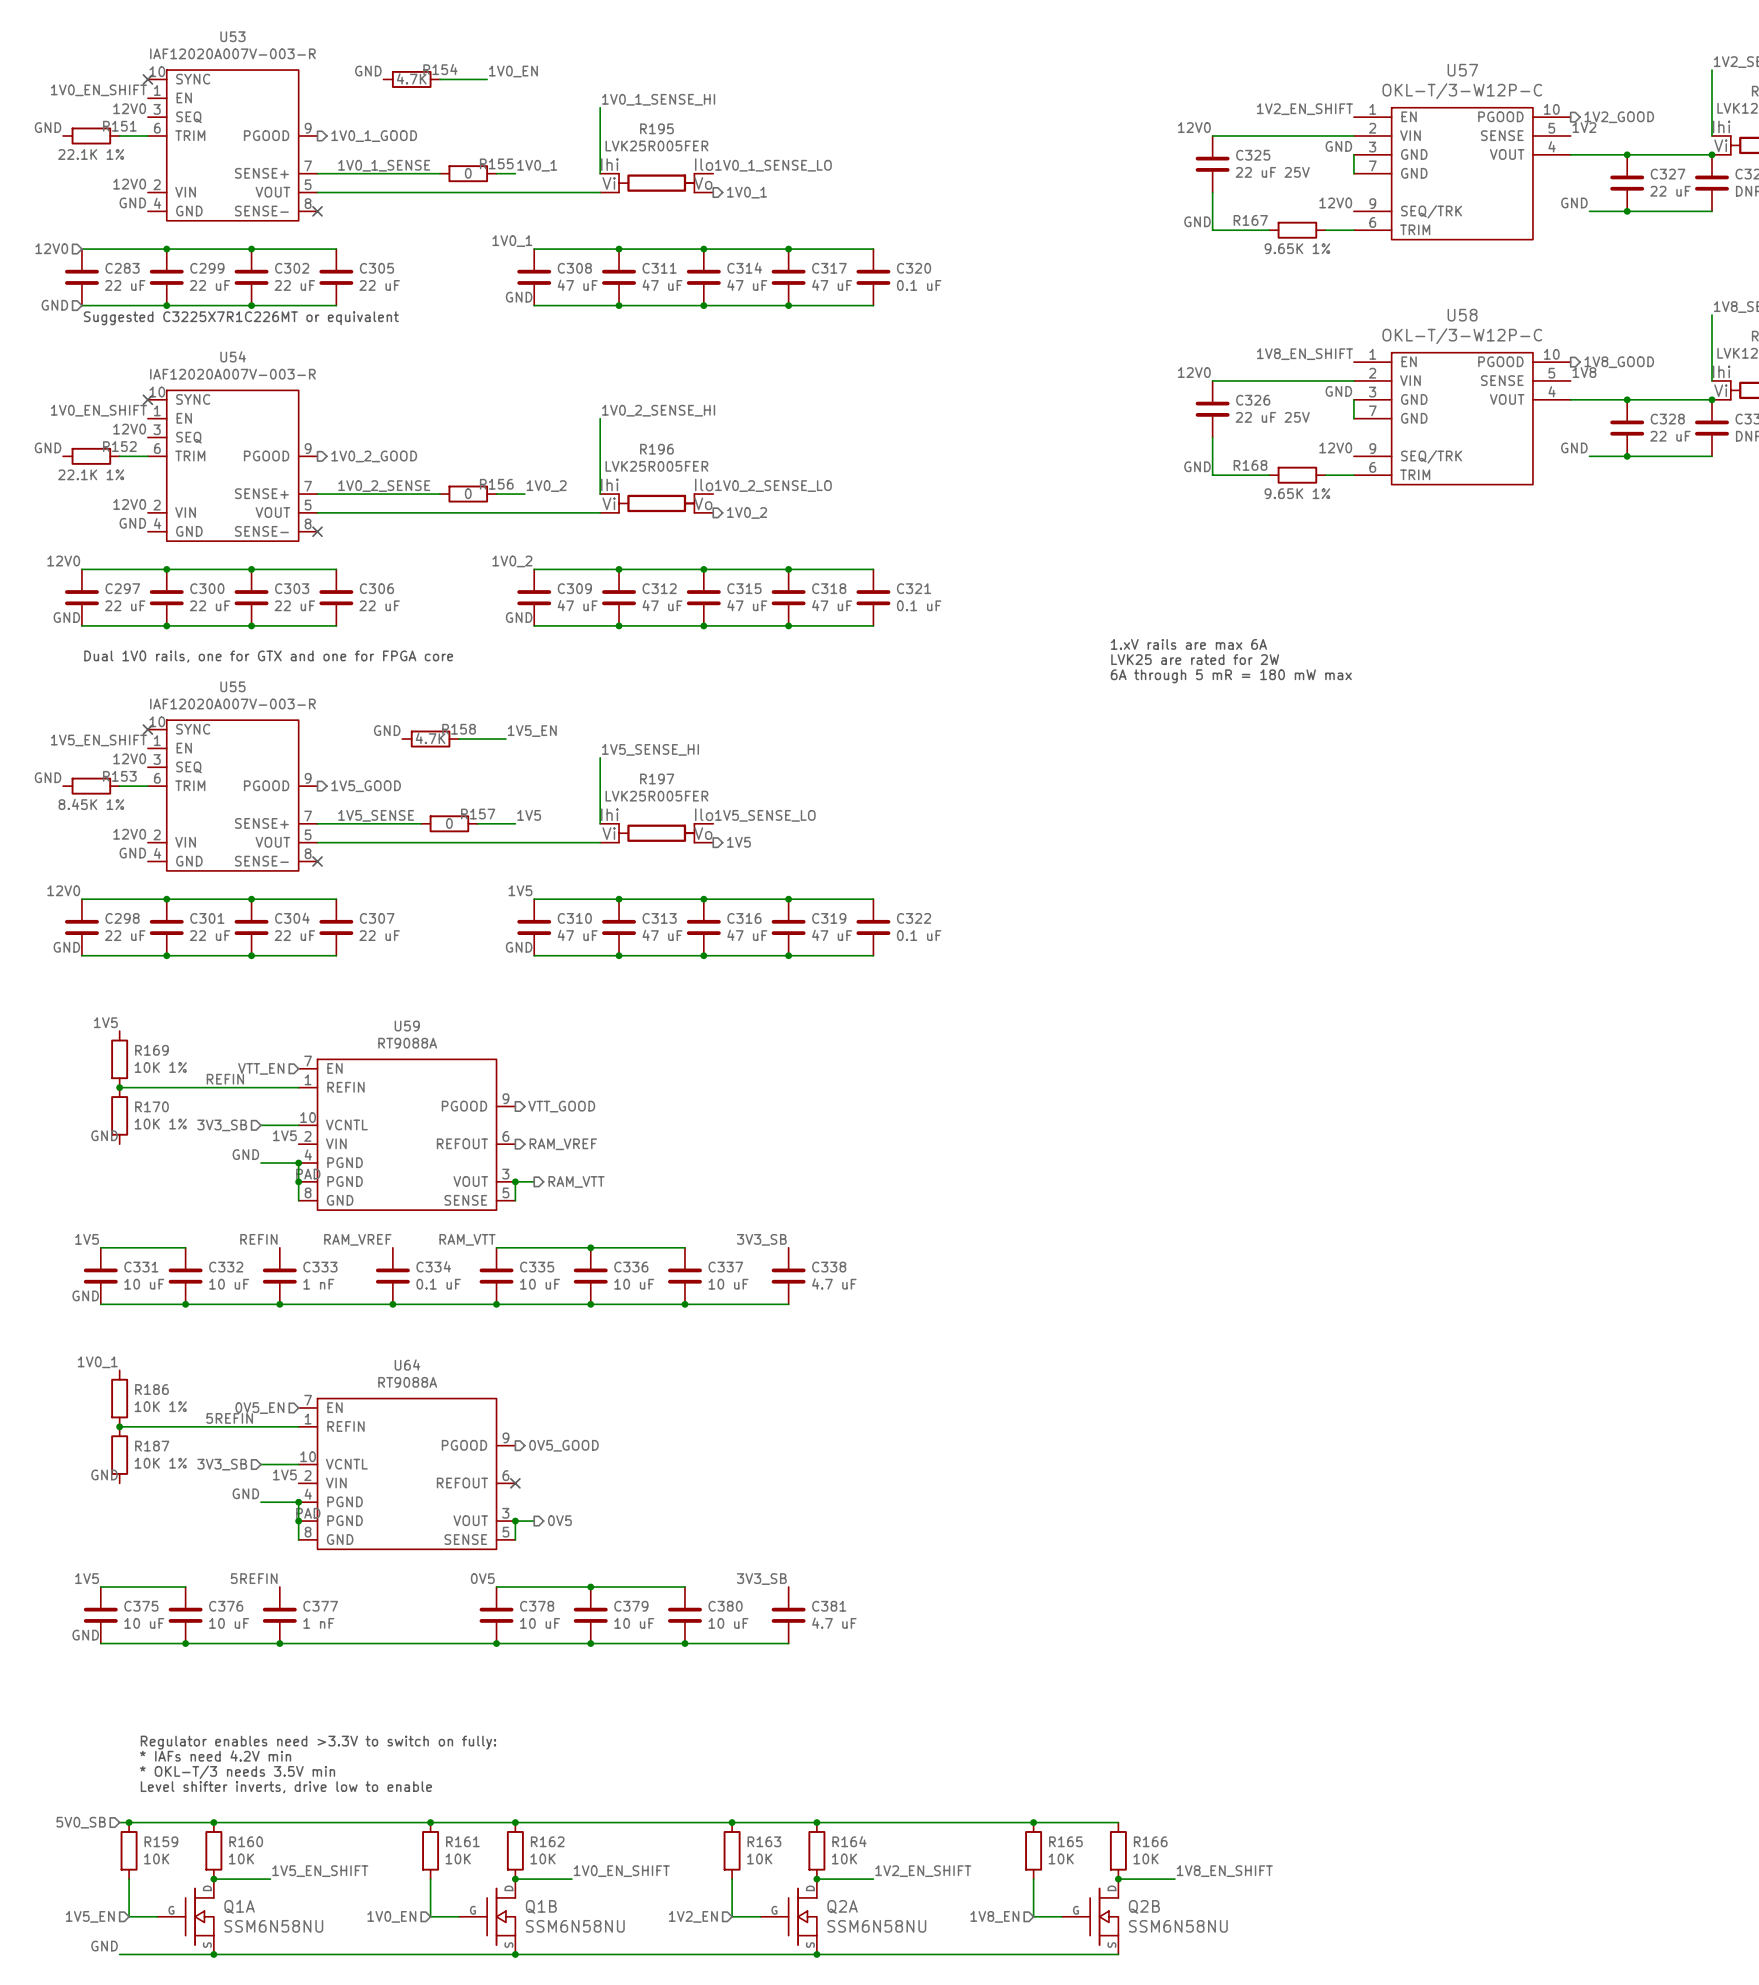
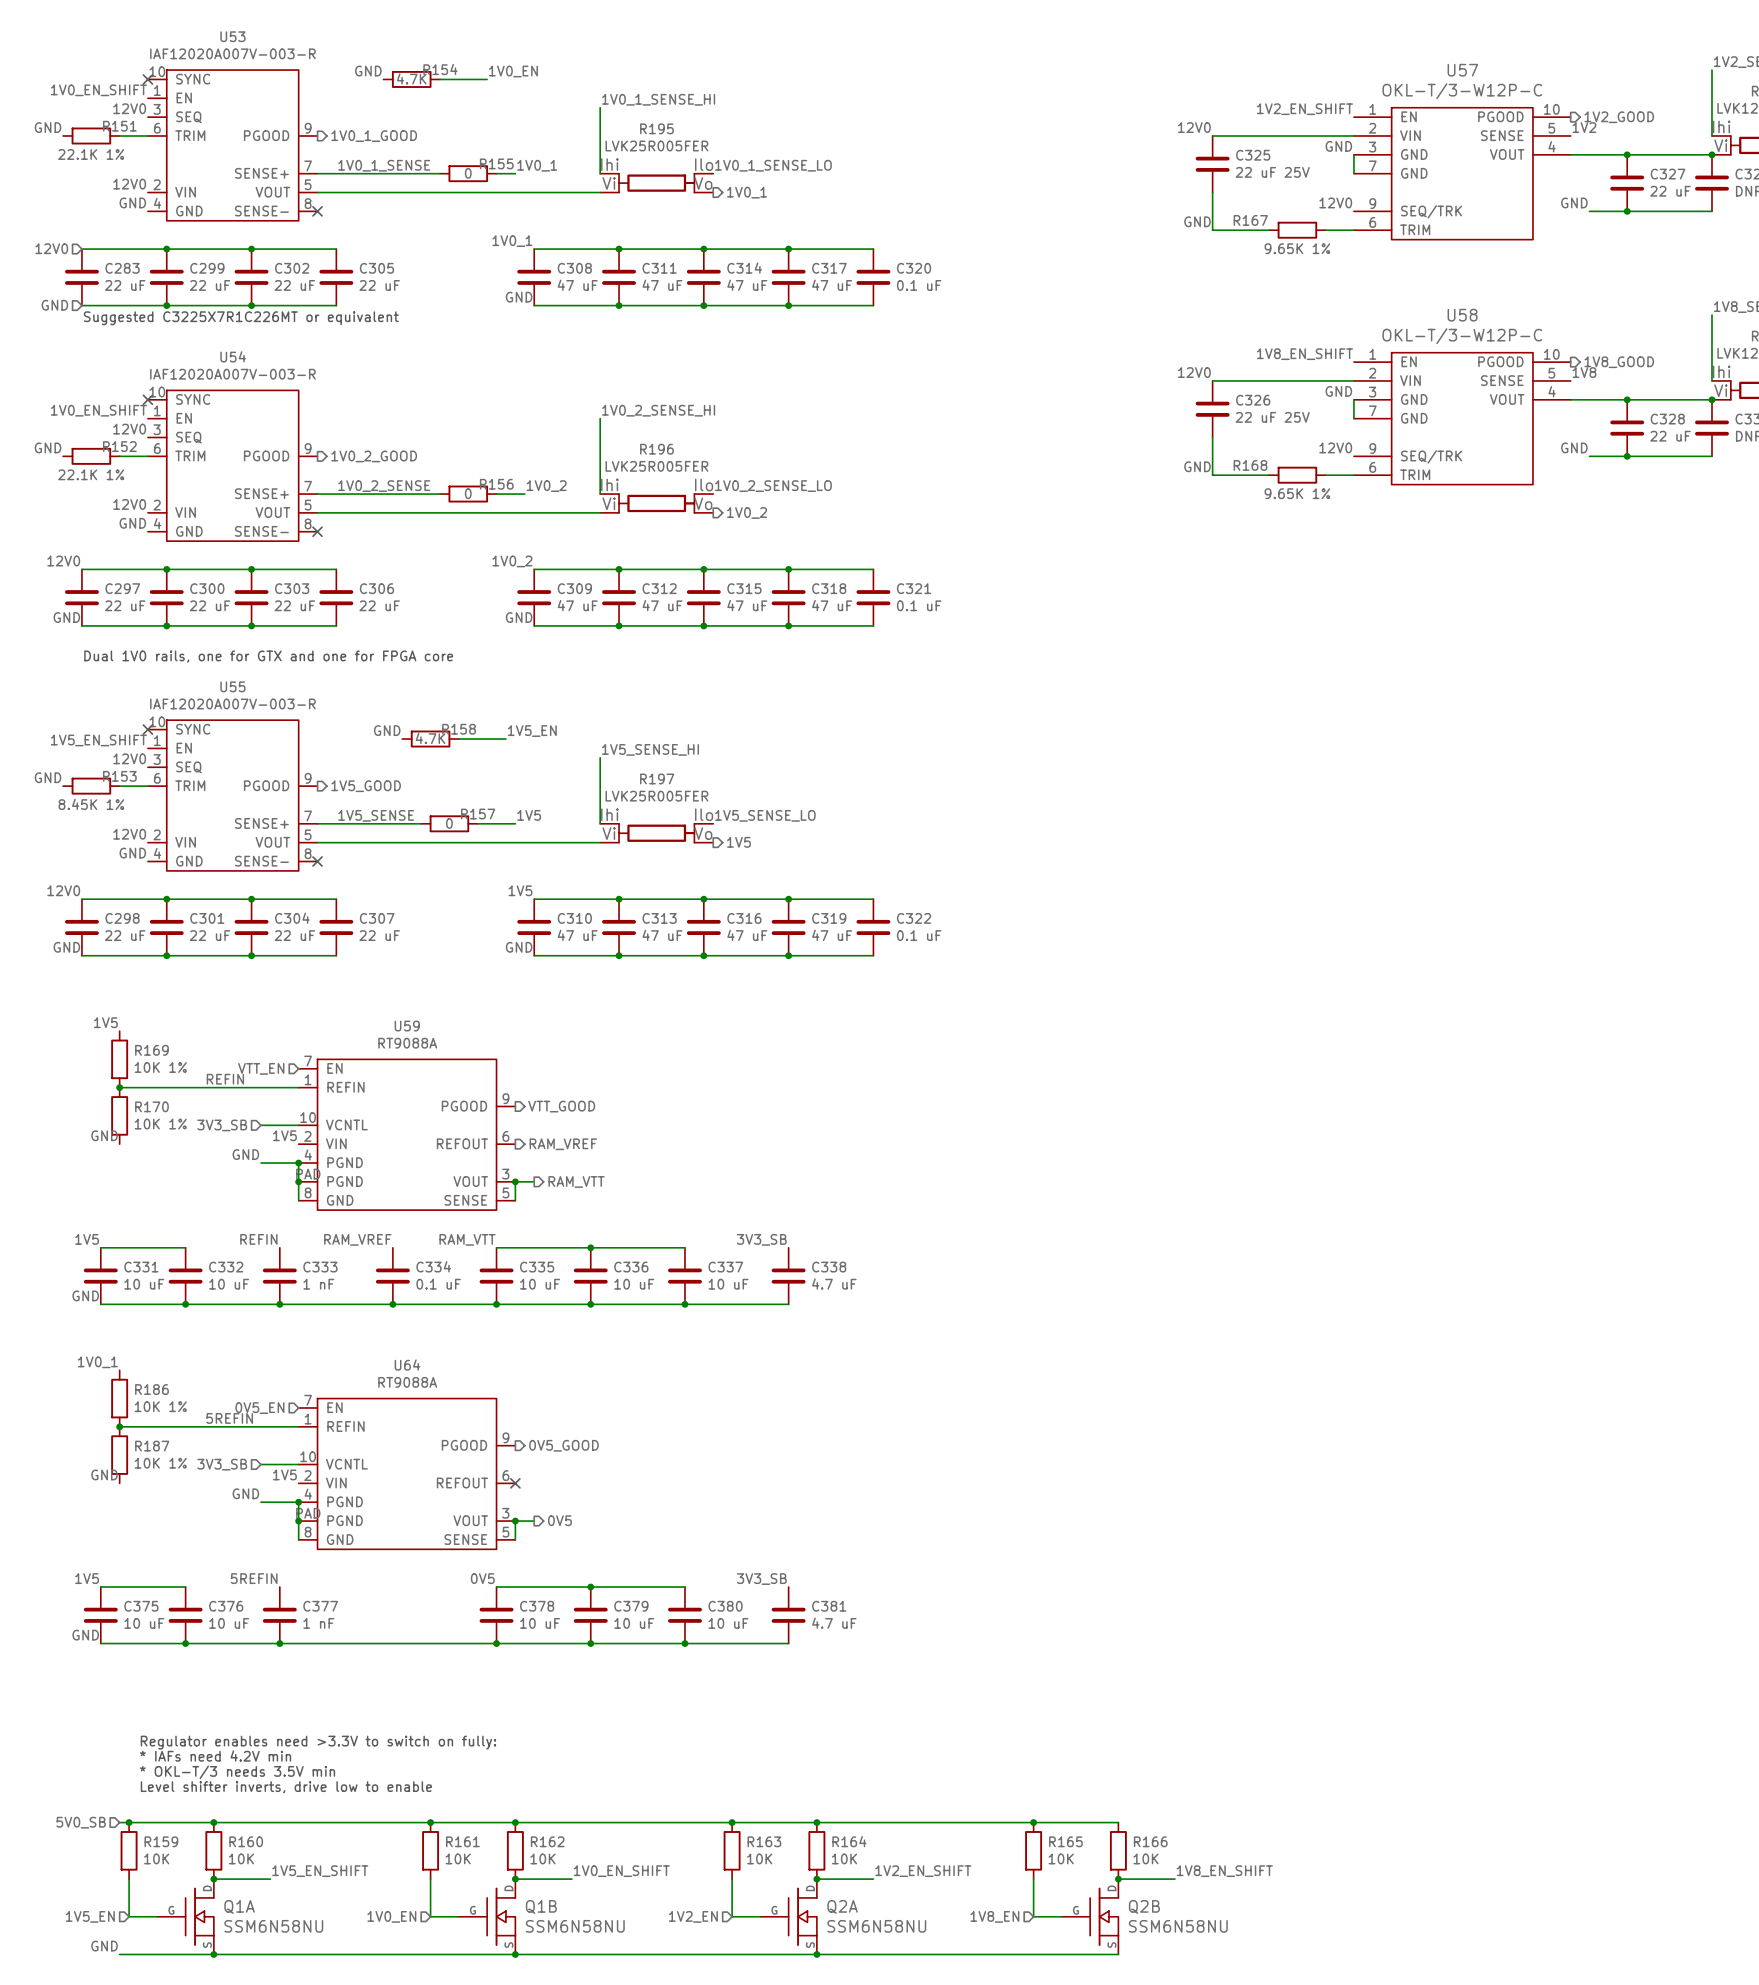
text: 1.xV rails are max 6A (1188, 644) -> none
text: LVK25 are rated for 2W (1195, 659) -> none
text: 6A through 5 mR = 180 mW max (1231, 676) -> none

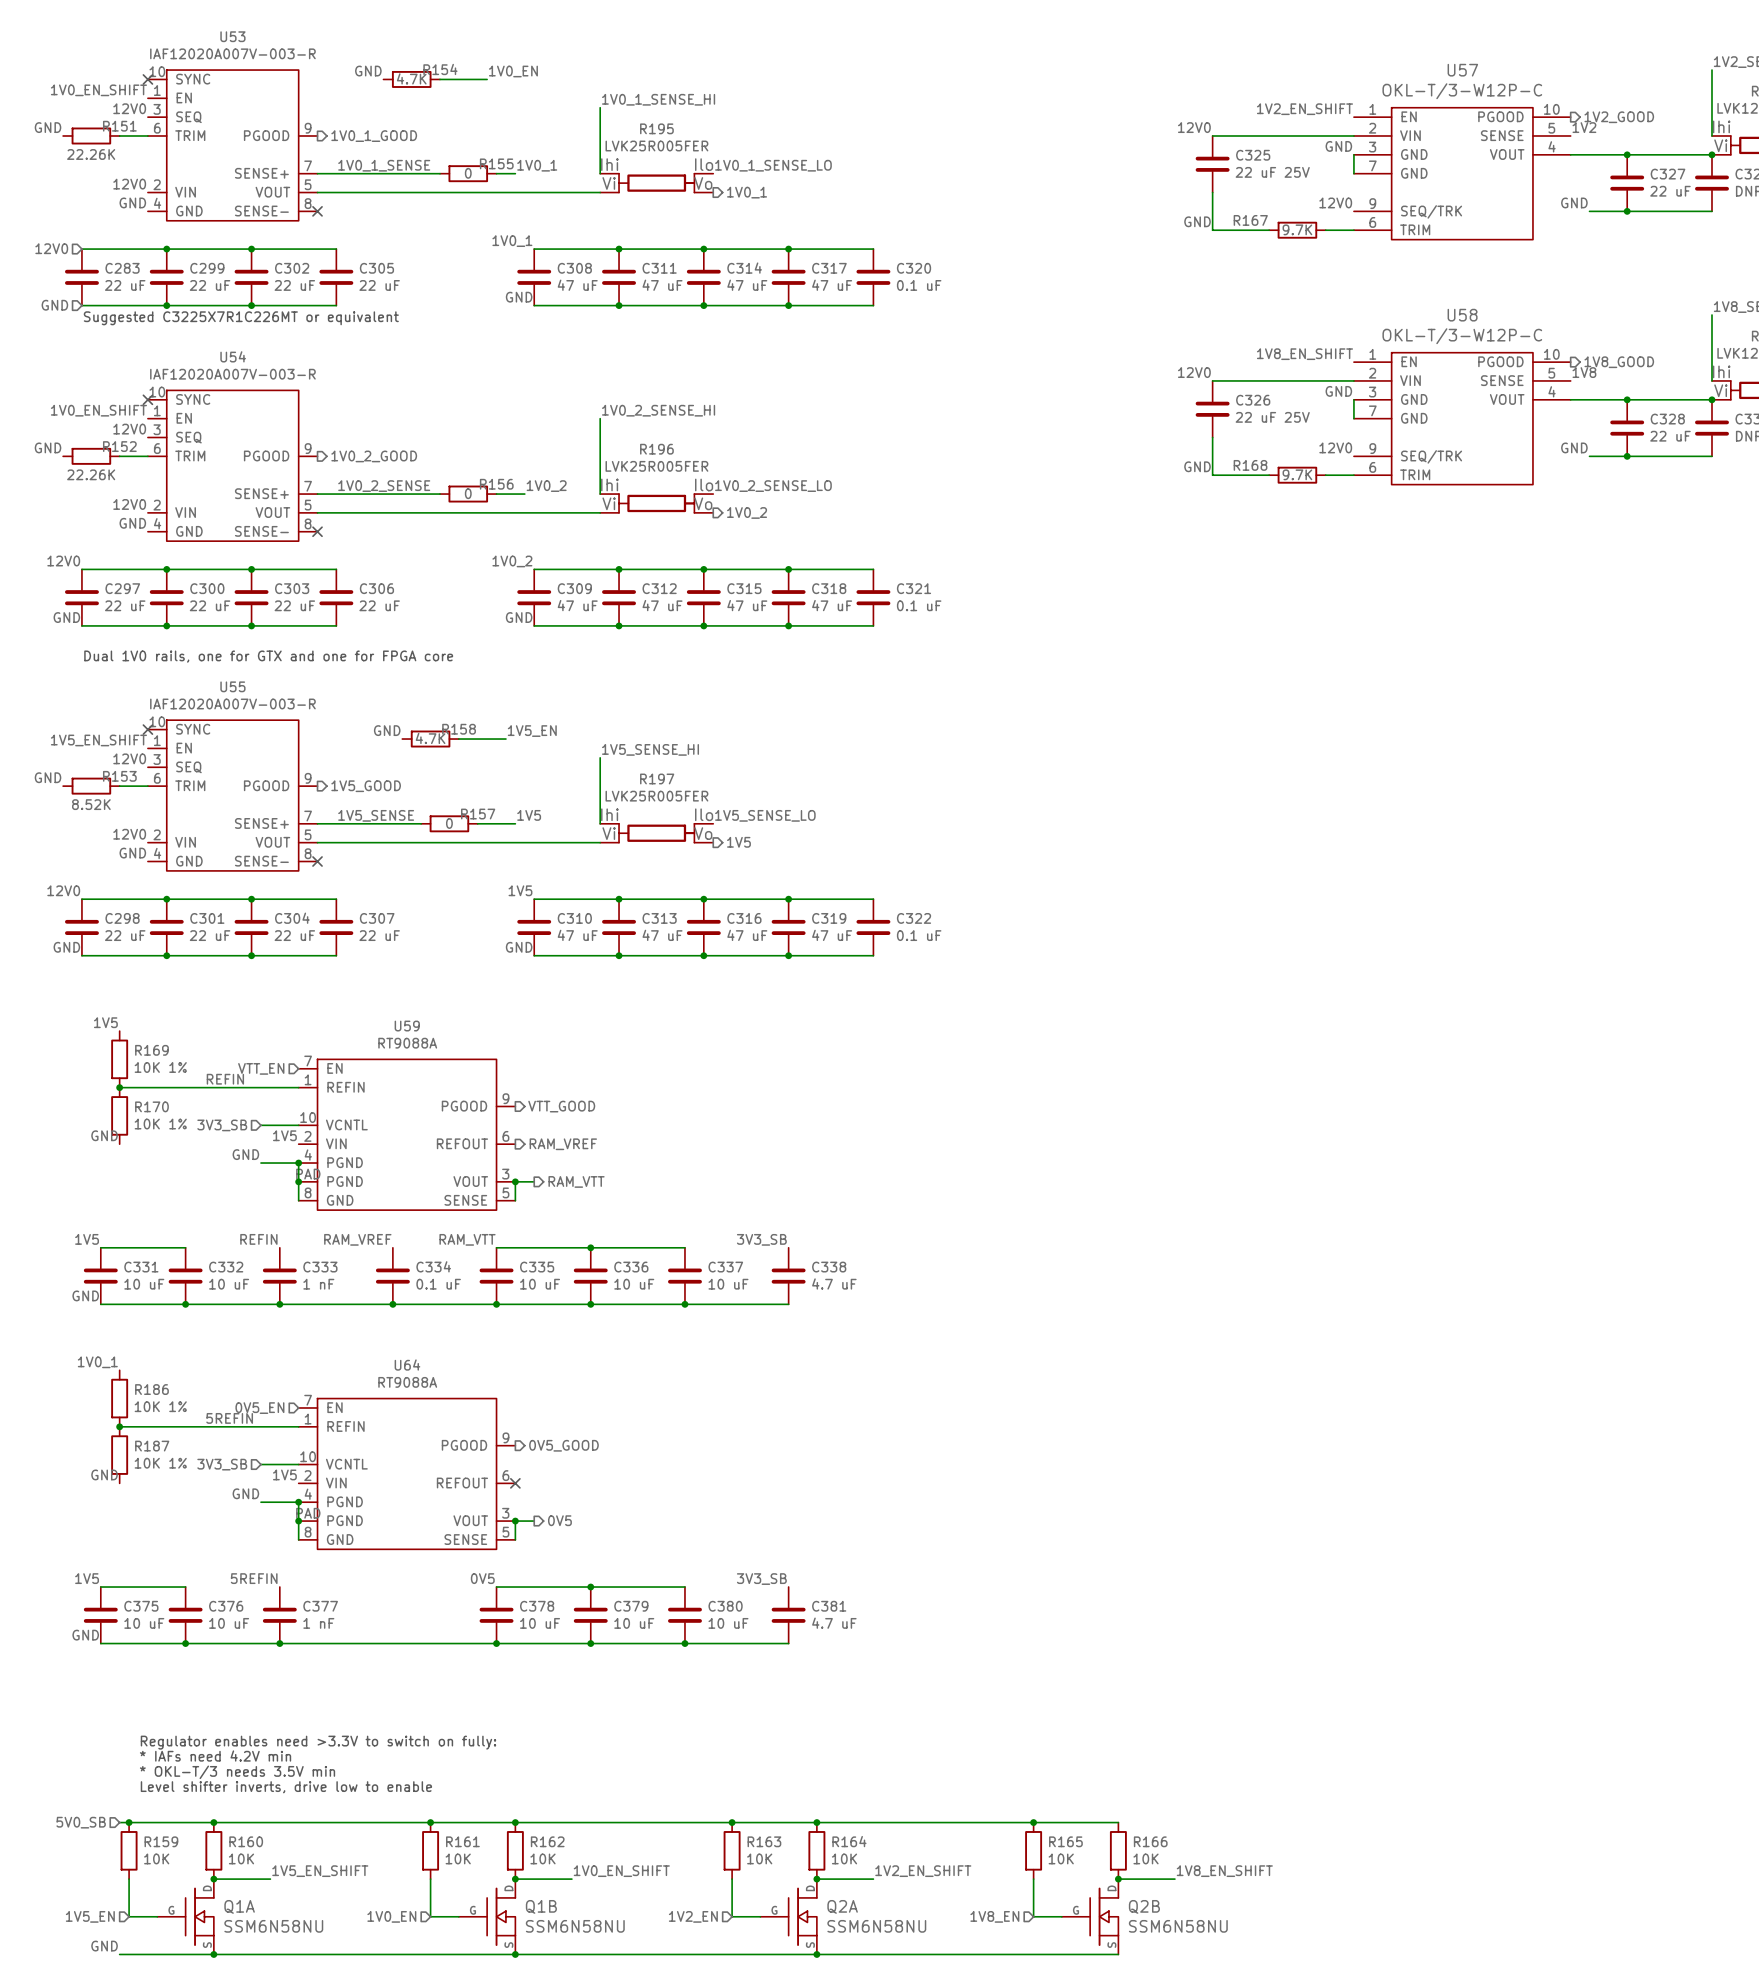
R151 value: 22.1K 1% (91, 154) -> 22.26K (91, 154)
R167 value: 9.65K 1% (1297, 248) -> 9.7K (1297, 229)
R152 value: 22.1K 1% (91, 474) -> 22.26K (91, 474)
R168 value: 9.65K 1% (1297, 493) -> 9.7K (1297, 474)
R153 value: 8.45K 1% (91, 804) -> 8.52K (91, 804)

